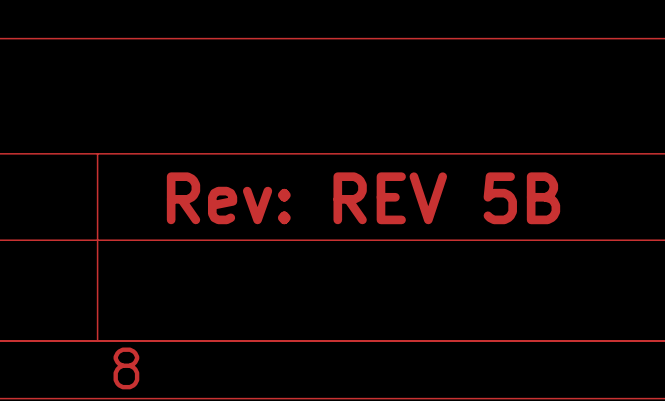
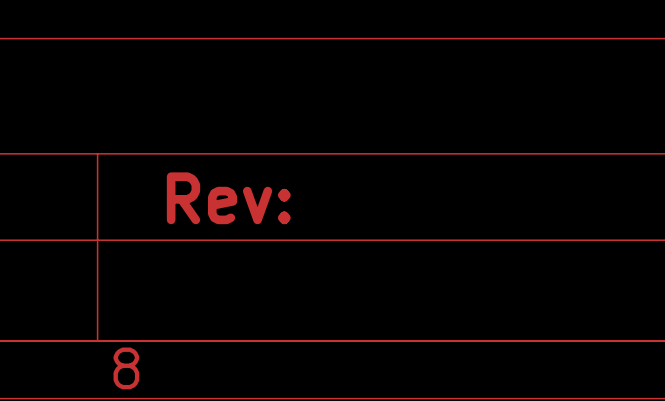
title block: Rev: REV 5B (363, 198) -> Rev: (228, 198)

